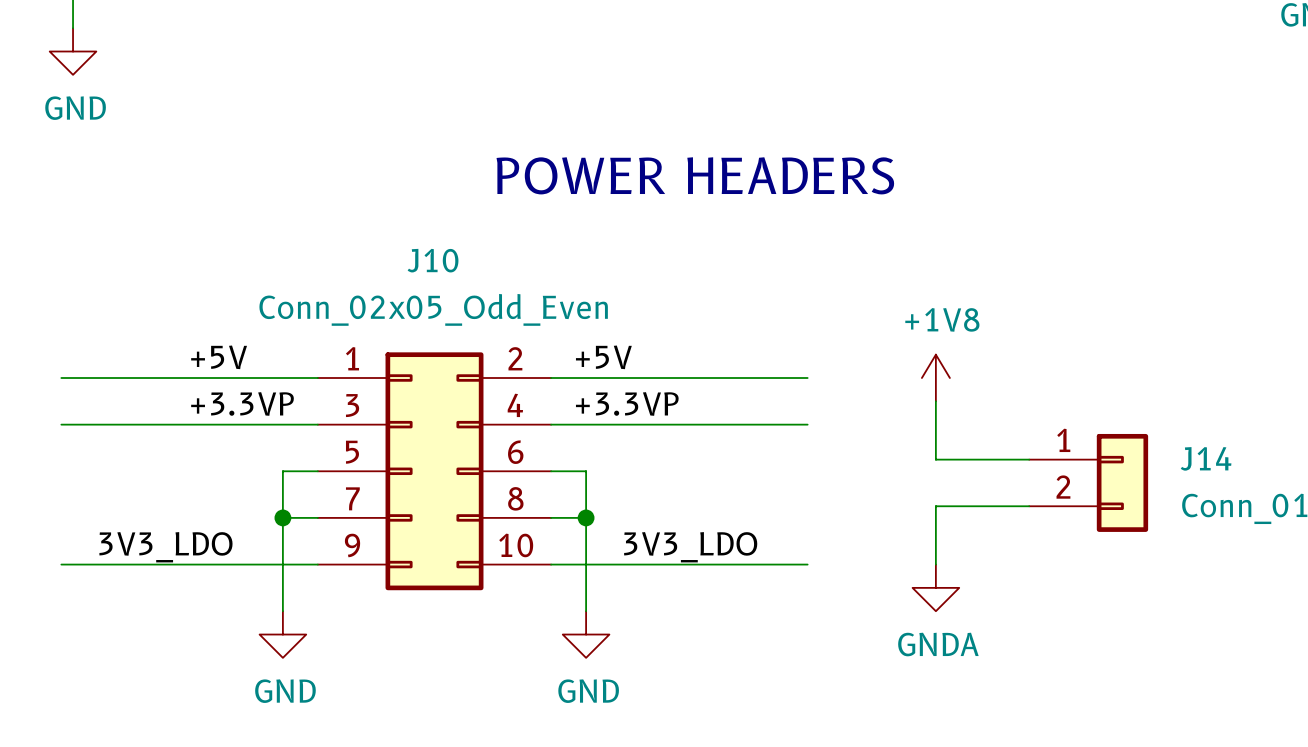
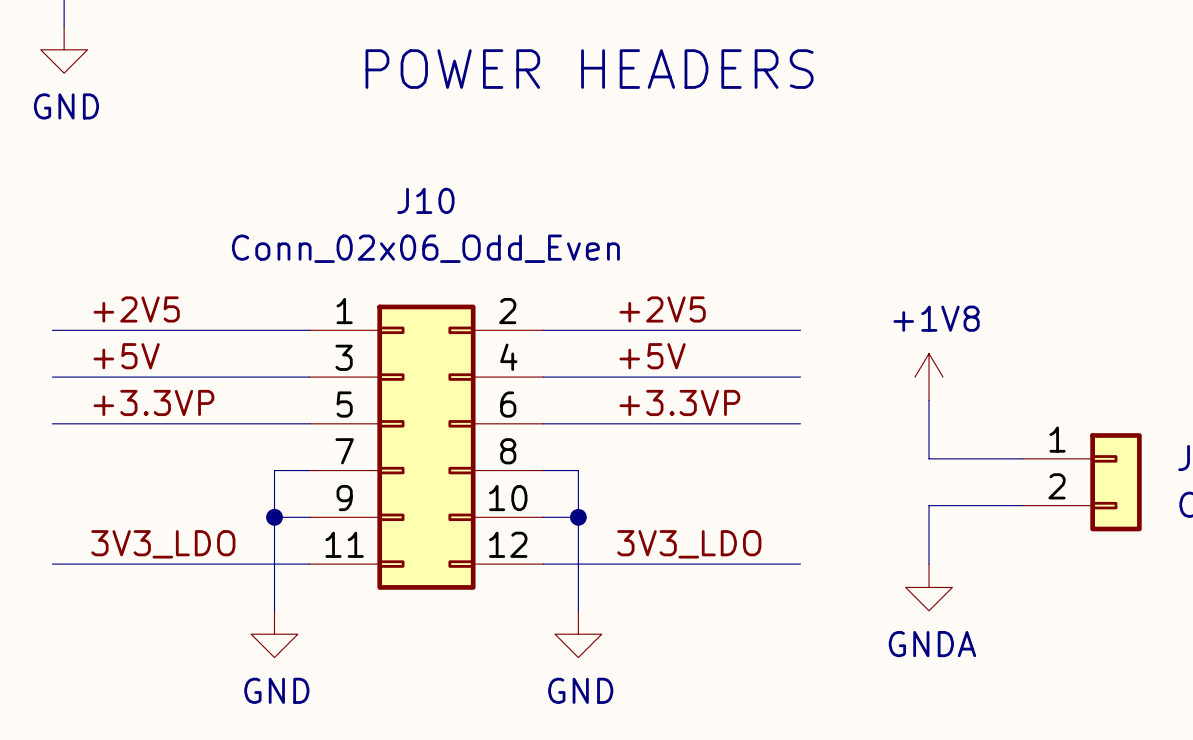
text position: POWER HEADERS (695, 175) -> POWER HEADERS (589, 69)
J10 value: Conn_02x05_Odd_Even (433, 309) -> Conn_02x06_Odd_Even (425, 248)
label: none -> +2V5 (136, 309)
label: none -> +2V5 (662, 309)
wire: none -> (52, 330) (309, 330)
wire: none -> (543, 330) (800, 330)
J10 symbol: [317, 352, 552, 591] -> [309, 304, 544, 590]
label position: +5V (219, 357) -> +5V (126, 356)
label position: +5V (603, 357) -> +5V (652, 356)
label position: +3.3VP (242, 403) -> +3.3VP (153, 402)
label position: +3.3VP (627, 403) -> +3.3VP (679, 402)

